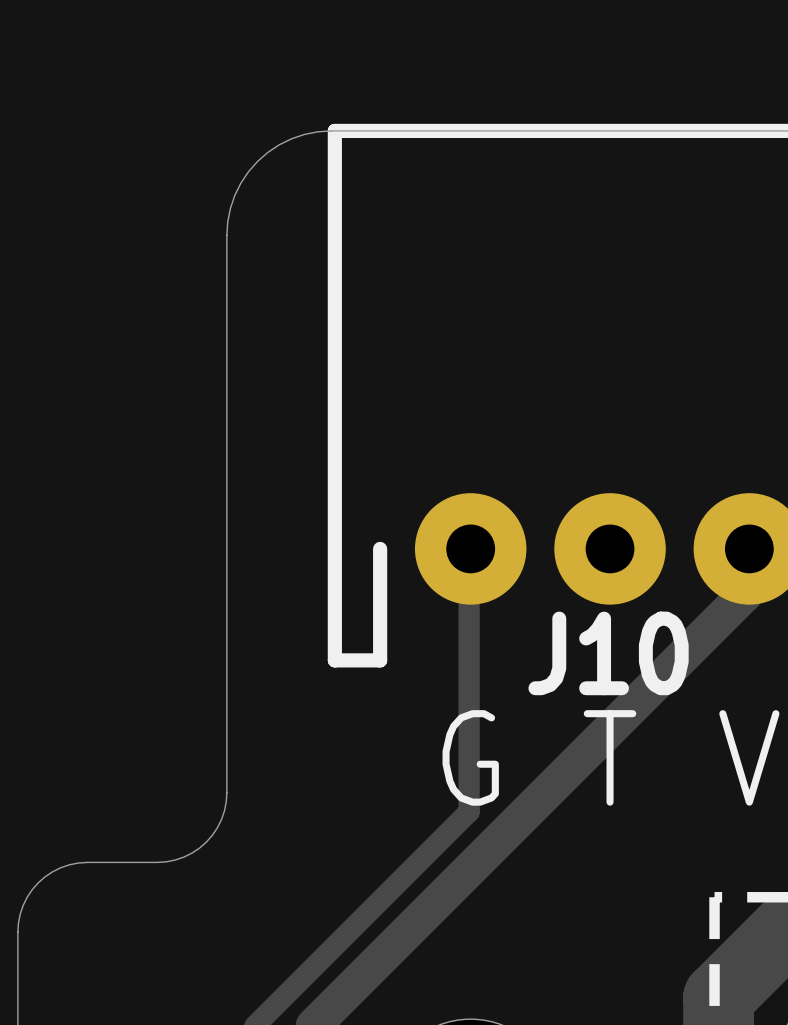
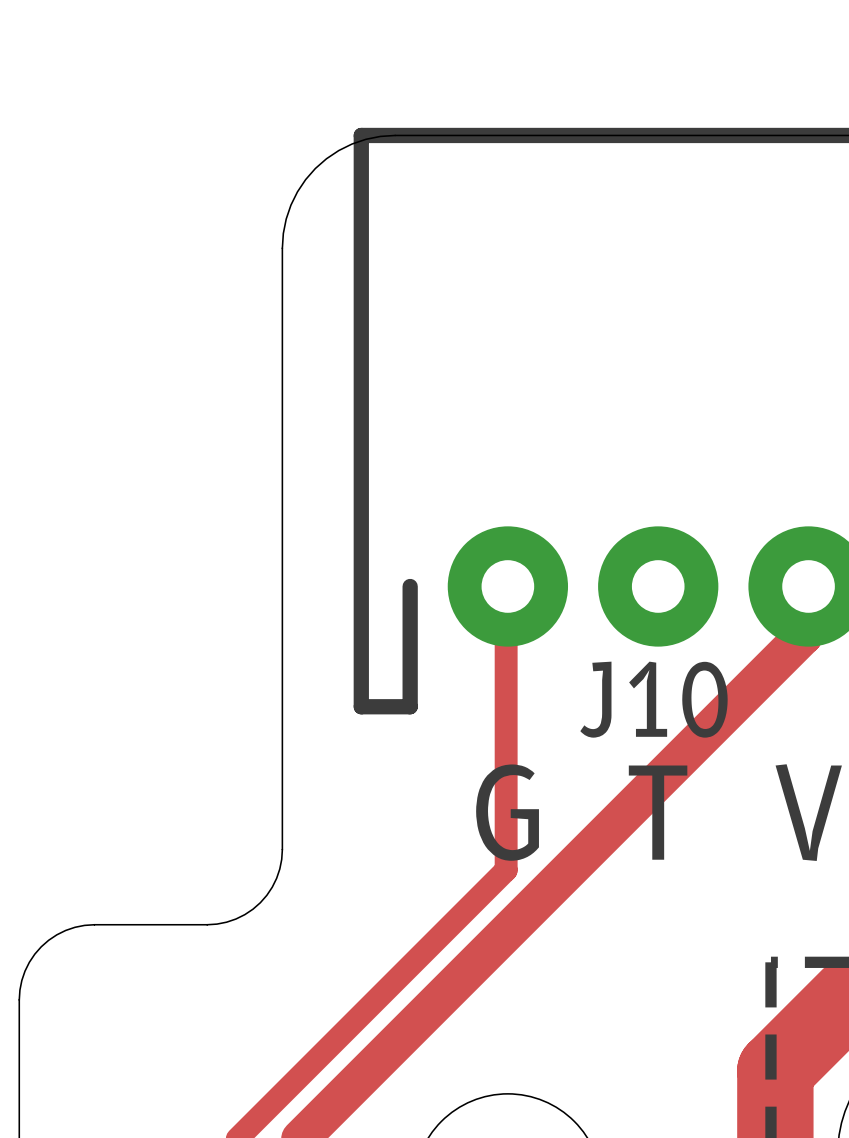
board edge: (366, 130) (317, 131) (304, 134) (279, 144) (257, 161) (248, 171) (240, 183) (230, 208) (226, 235) (226, 801) (217, 827) (199, 848) (183, 857) (157, 862) -> (395, 135) (380, 136) (351, 144) (338, 150) (315, 168) (297, 191) (290, 205) (283, 233) (282, 849) (279, 869) (266, 895) (244, 914) (217, 924) (169, 924)

